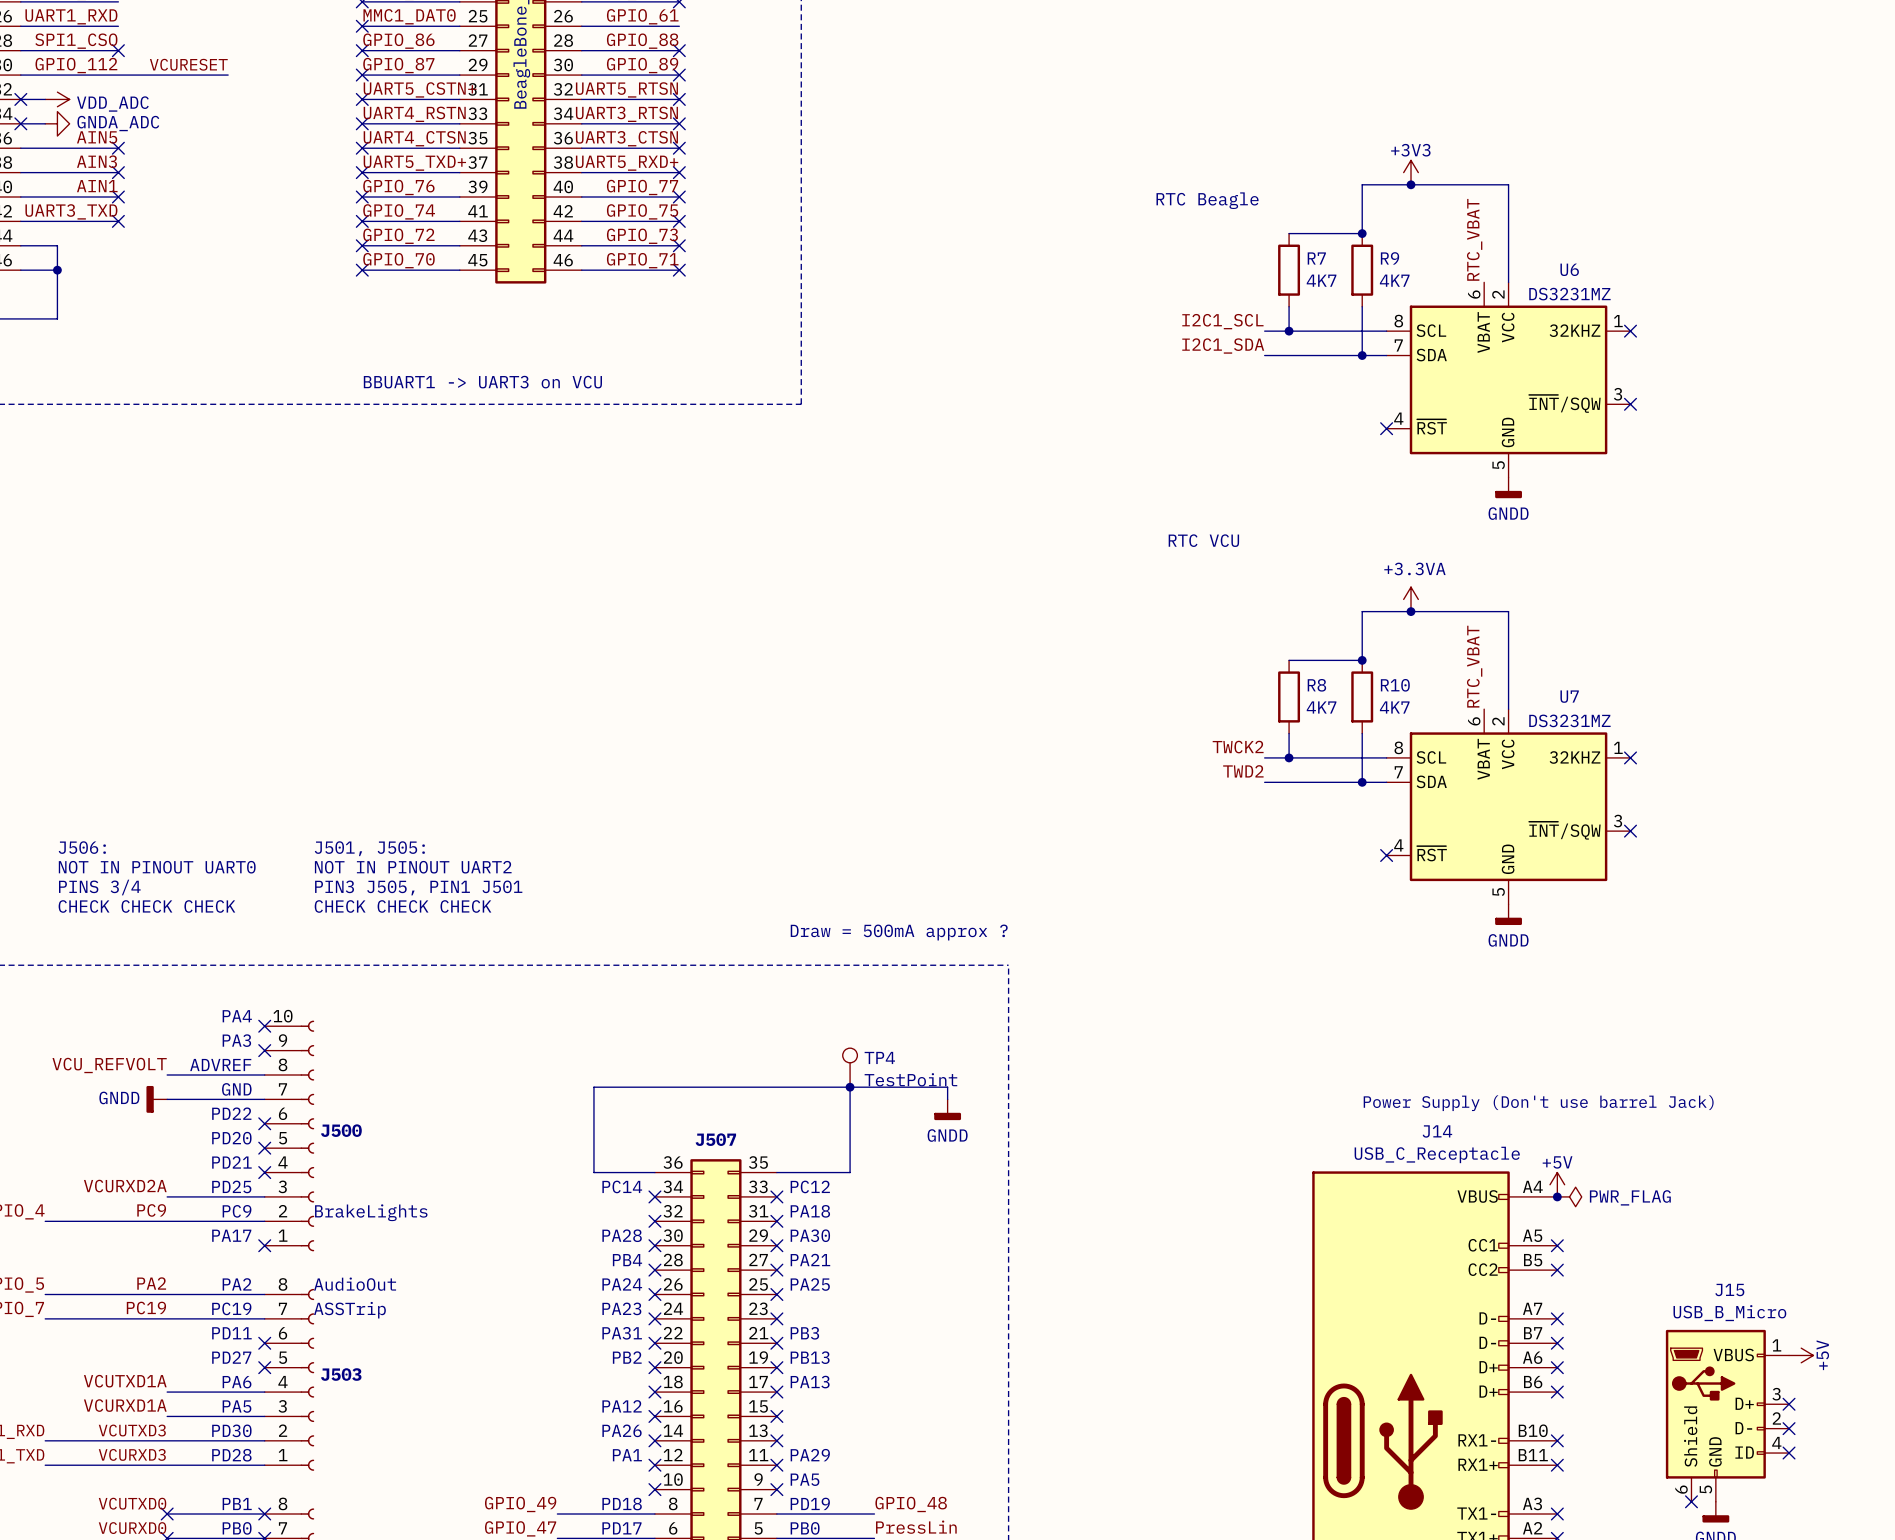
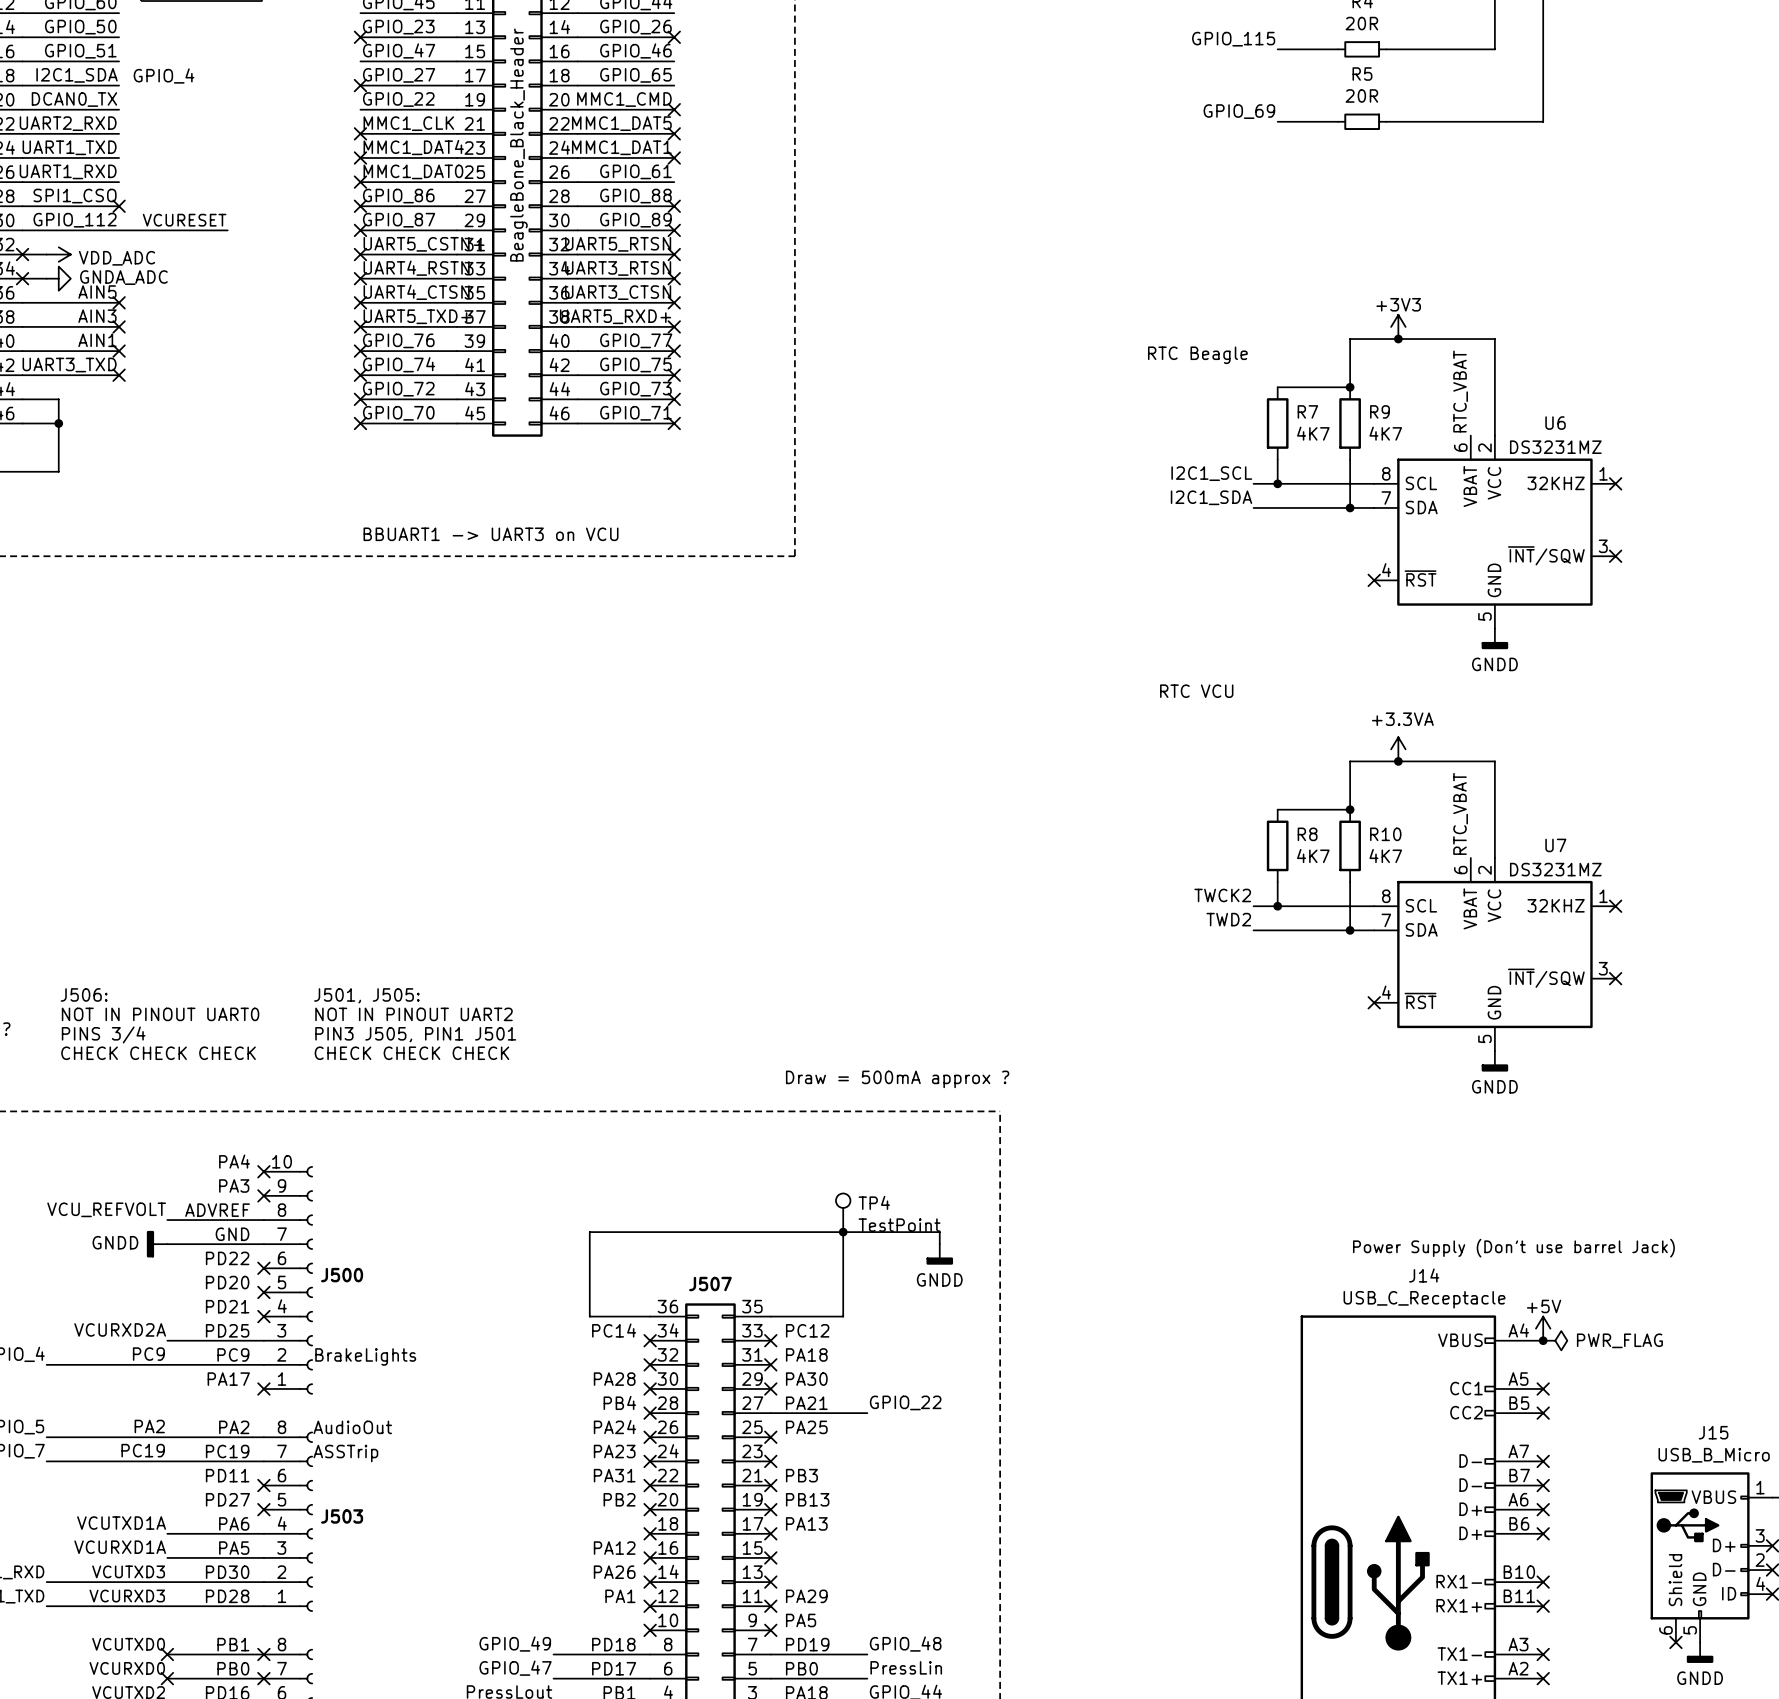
label: none -> GPIO_22 (905, 1402)
wire: none -> (770, 1413) (867, 1413)
no-connect mark: (776, 1270) -> none

